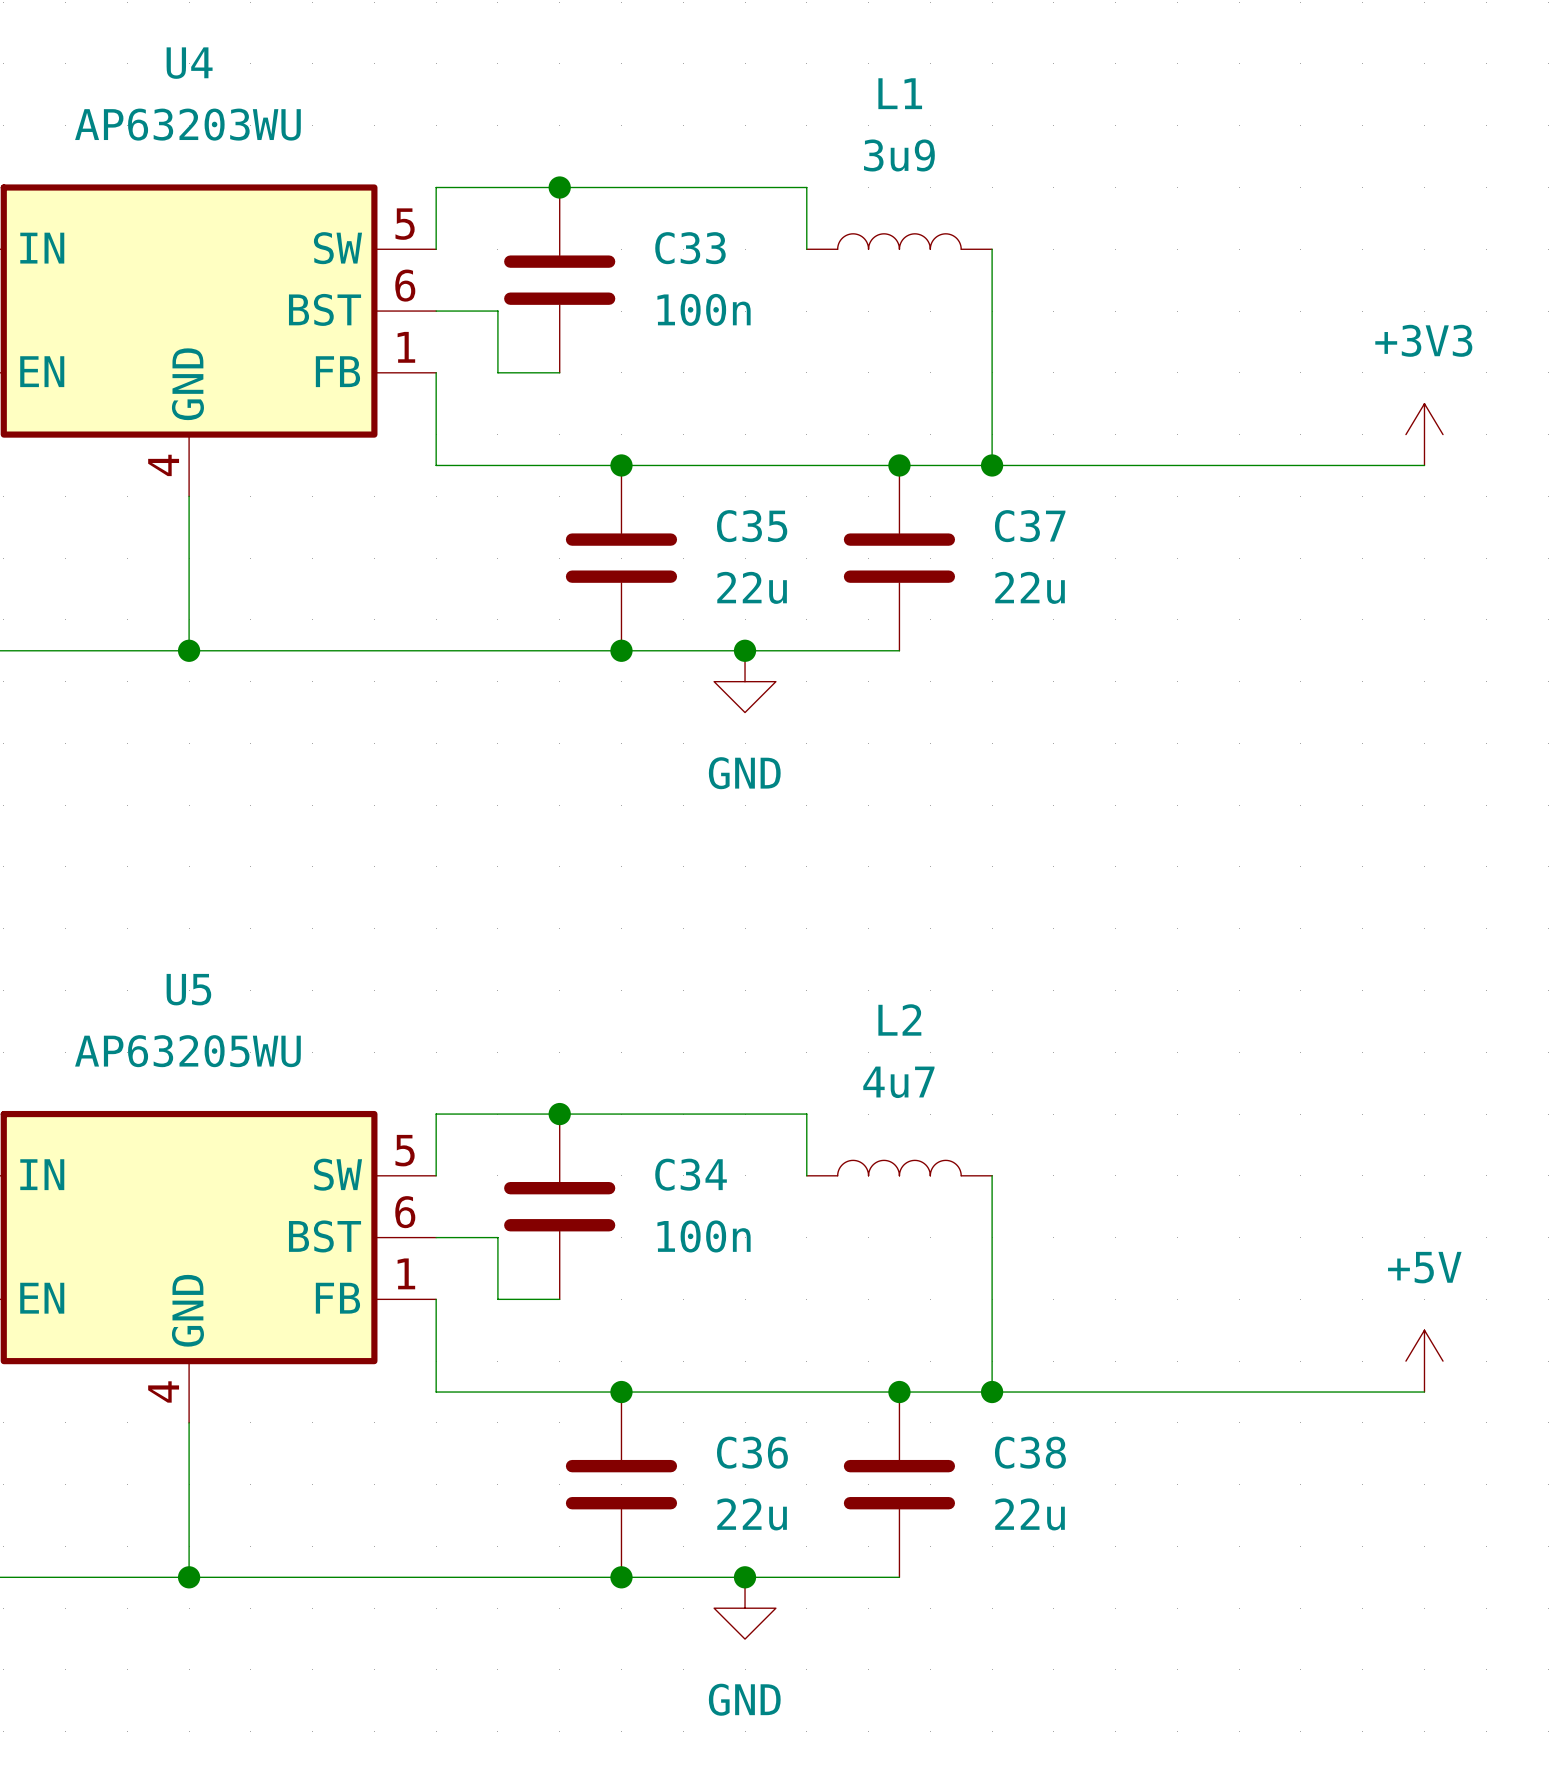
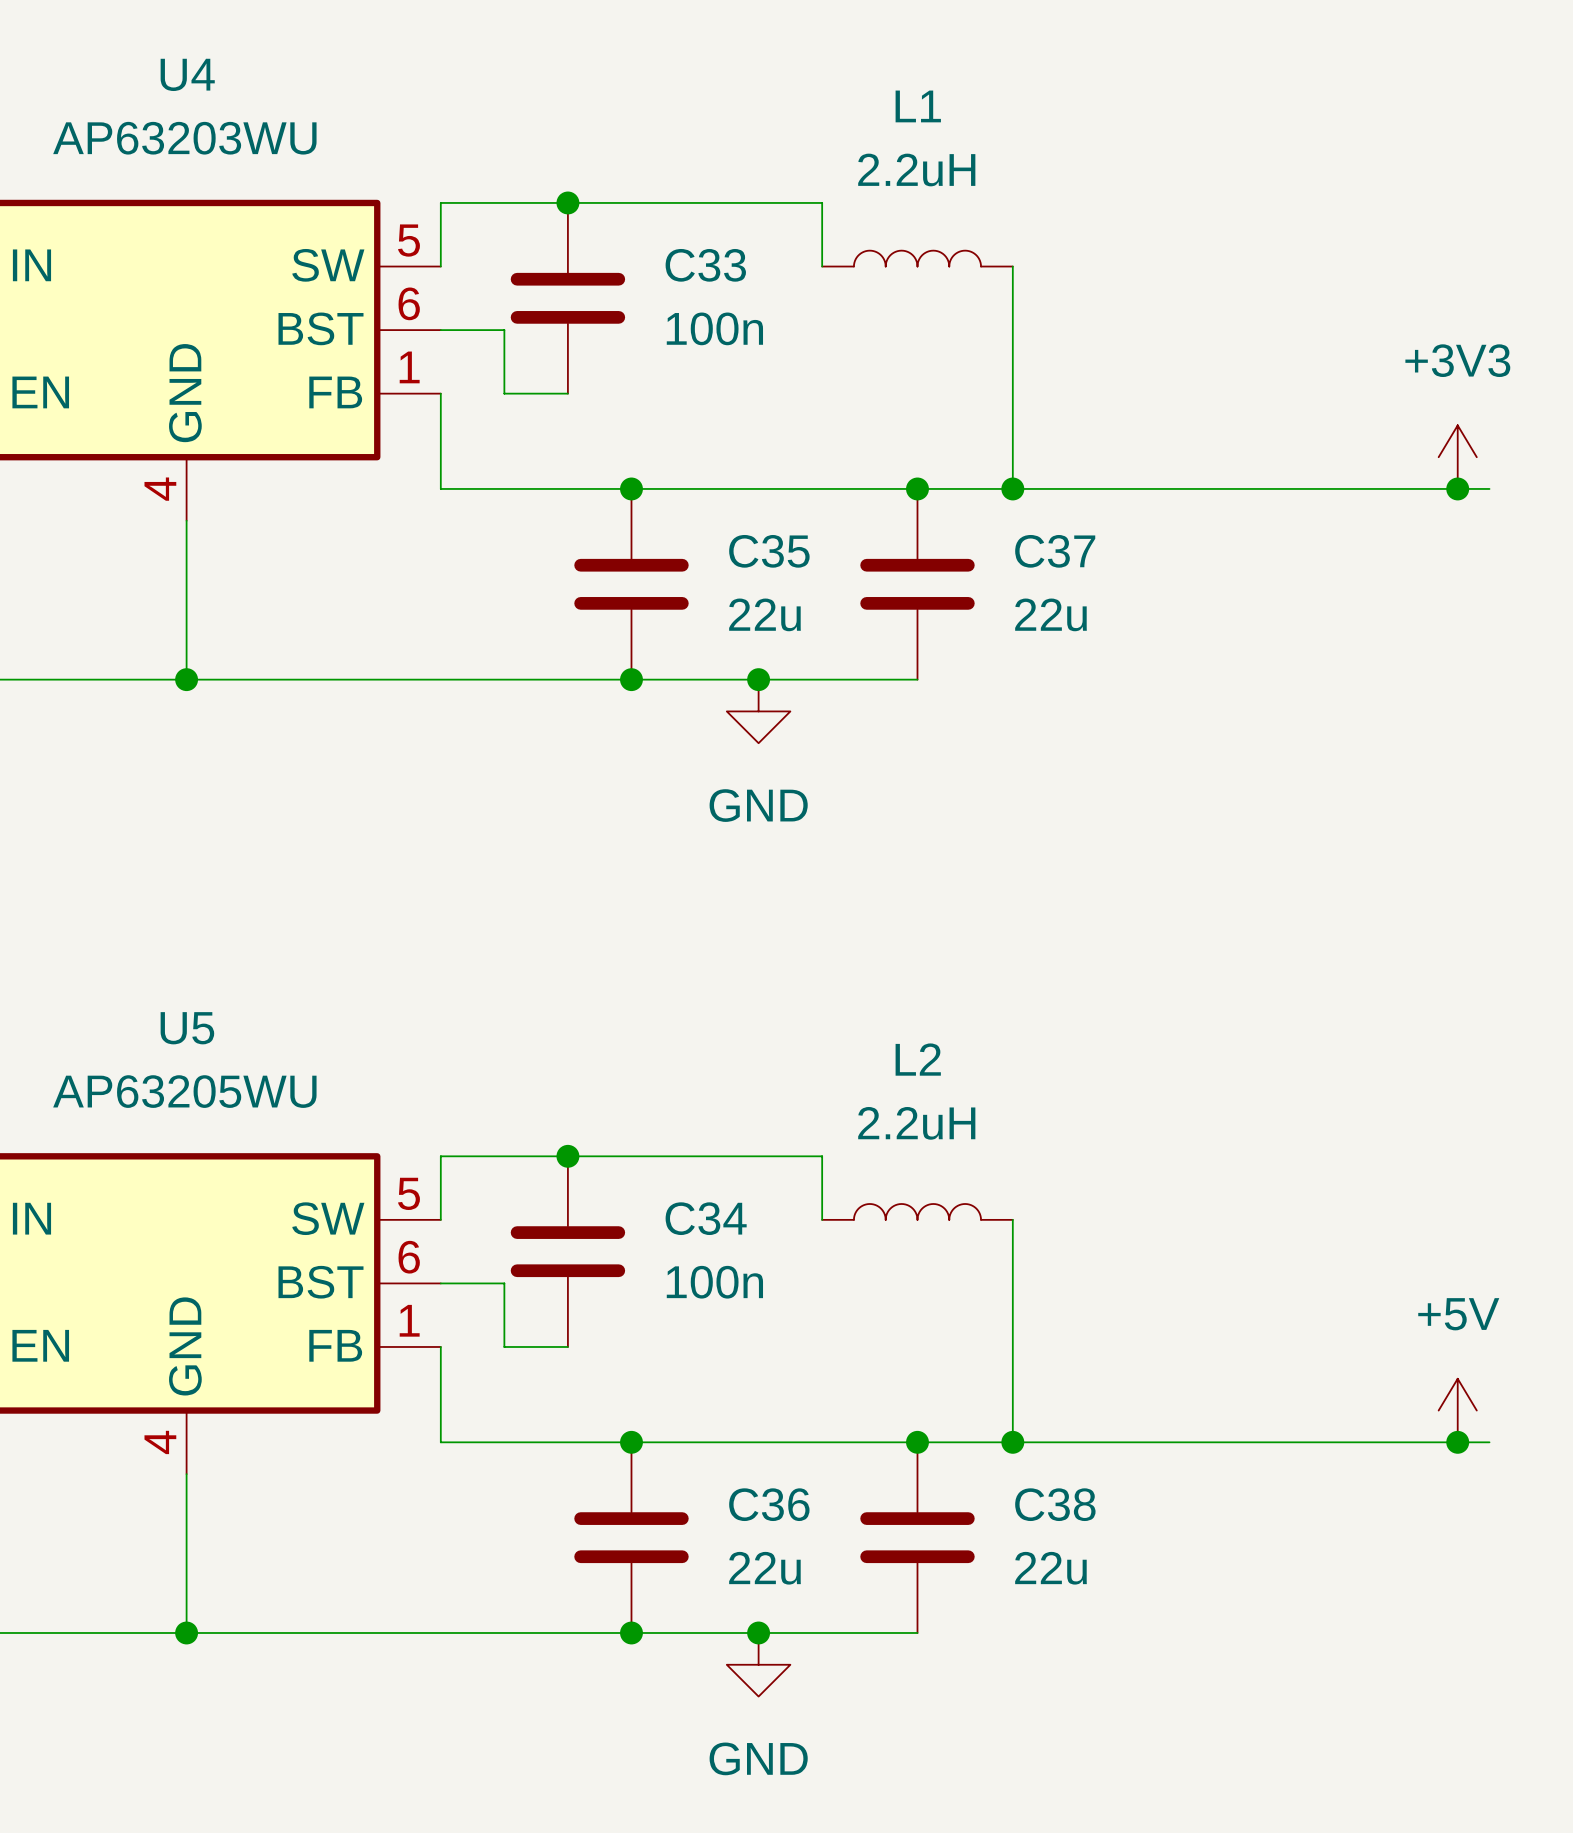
L1 value: 3u9 (899, 155) -> 2.2uH (916, 169)
wire: none -> (1457, 488) (1489, 488)
junction: none -> (1457, 488)
L2 value: 4u7 (898, 1082) -> 2.2uH (916, 1123)
wire: none -> (1457, 1442) (1489, 1442)
junction: none -> (1457, 1442)

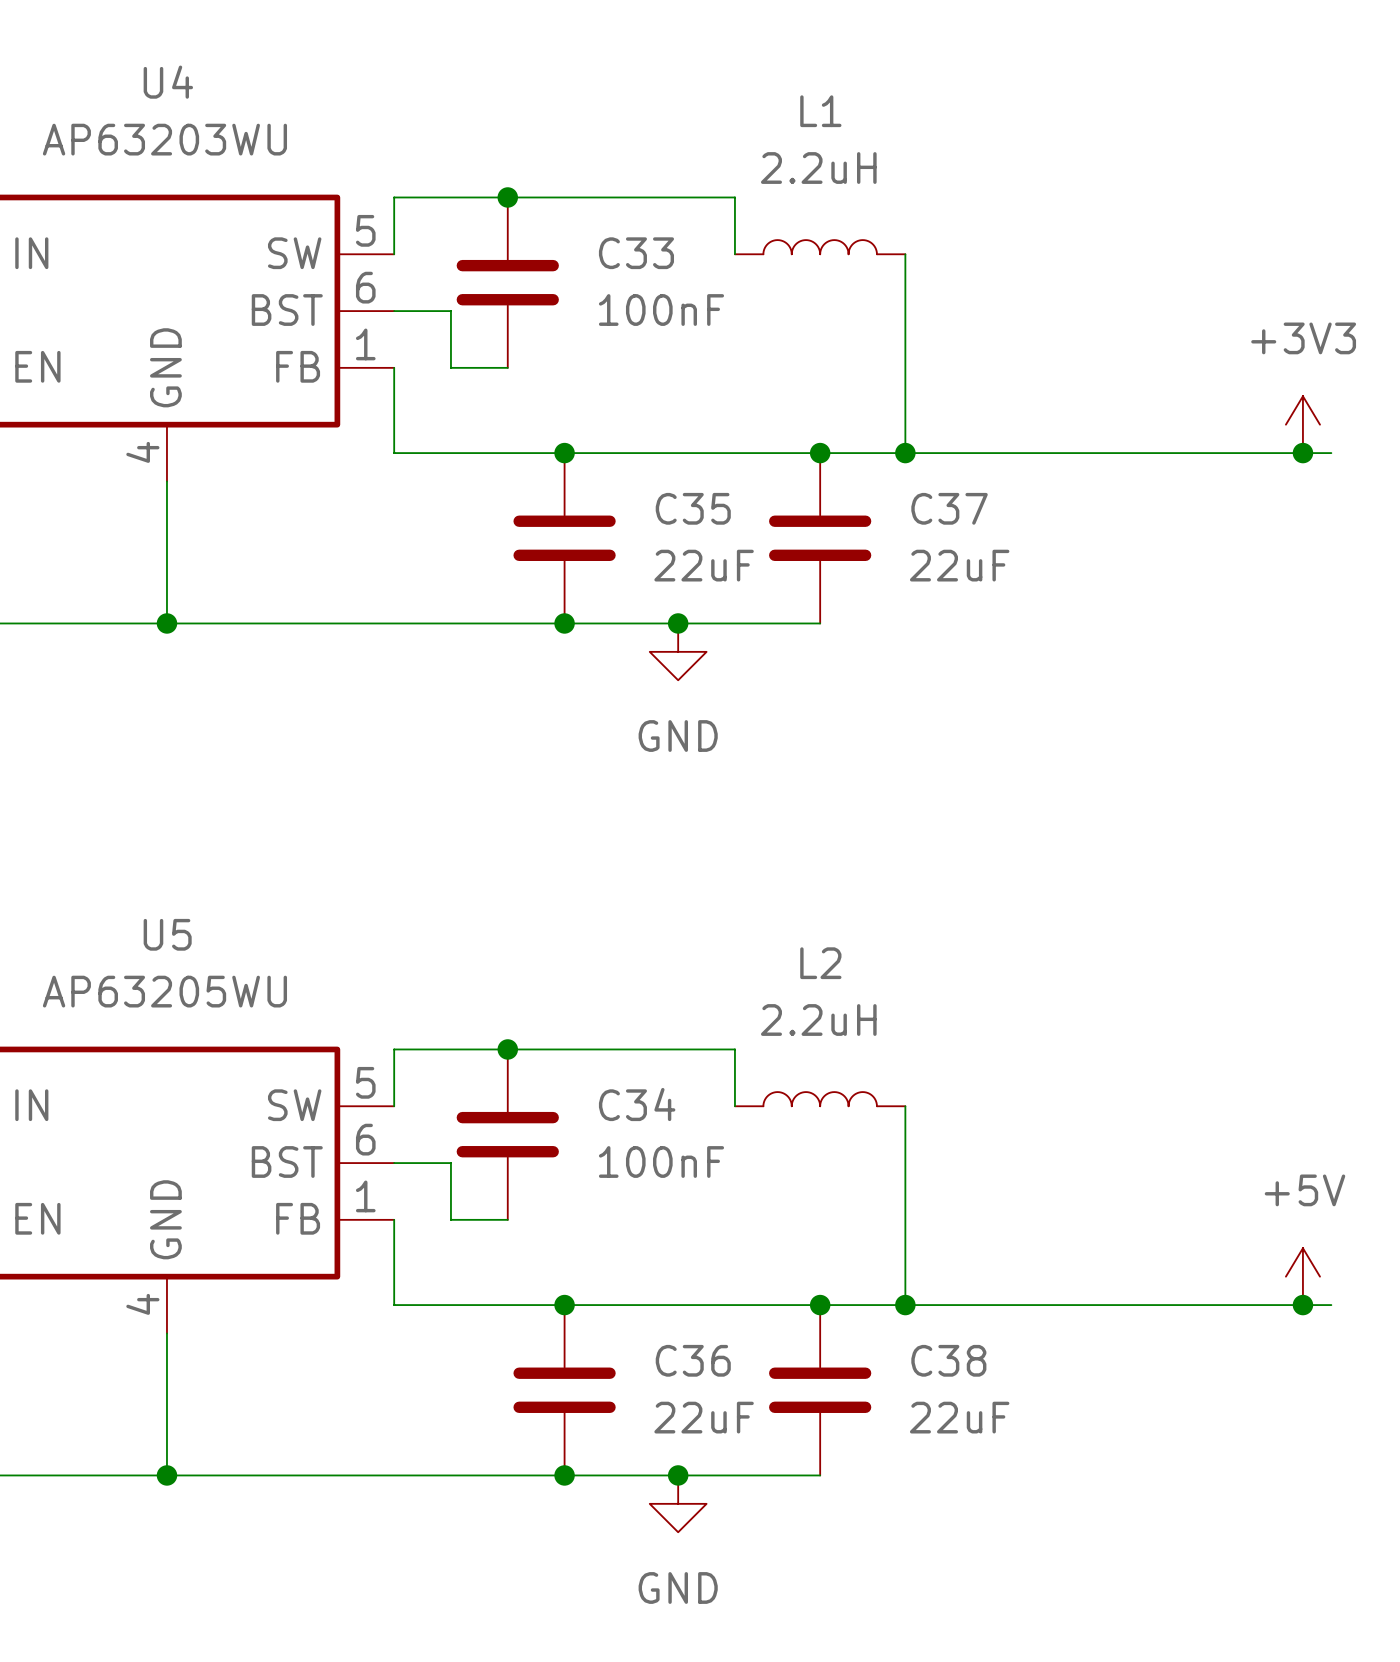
C33 value: 100n (714, 328) -> 100nF (661, 310)
C35 value: 22u (764, 614) -> 22uF (704, 565)
C37 value: 22u (1050, 614) -> 22uF (959, 565)
C34 value: 100n (714, 1282) -> 100nF (661, 1161)
C36 value: 22u (764, 1568) -> 22uF (704, 1417)
C38 value: 22u (1050, 1568) -> 22uF (959, 1417)

